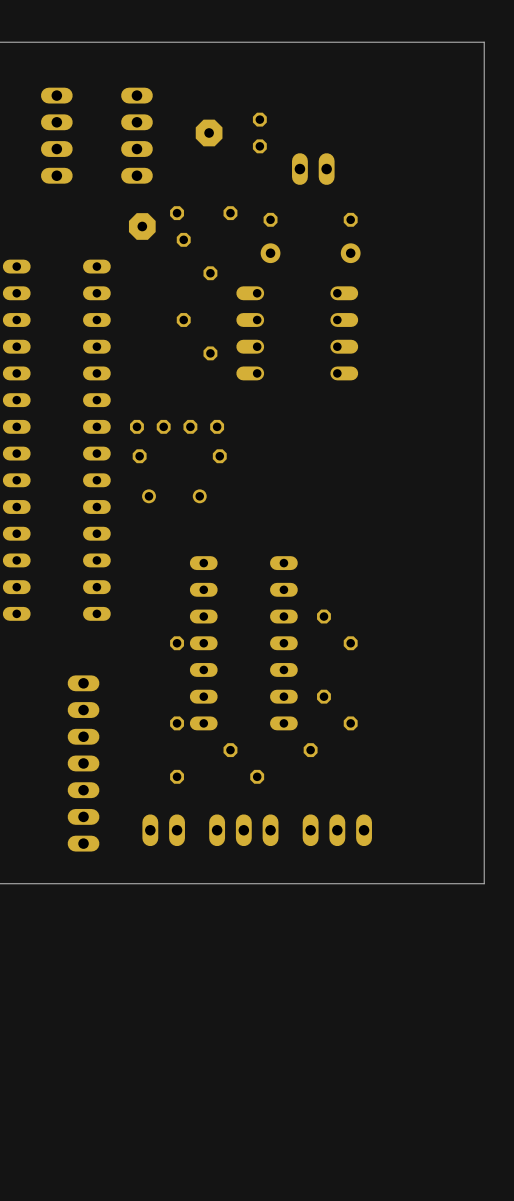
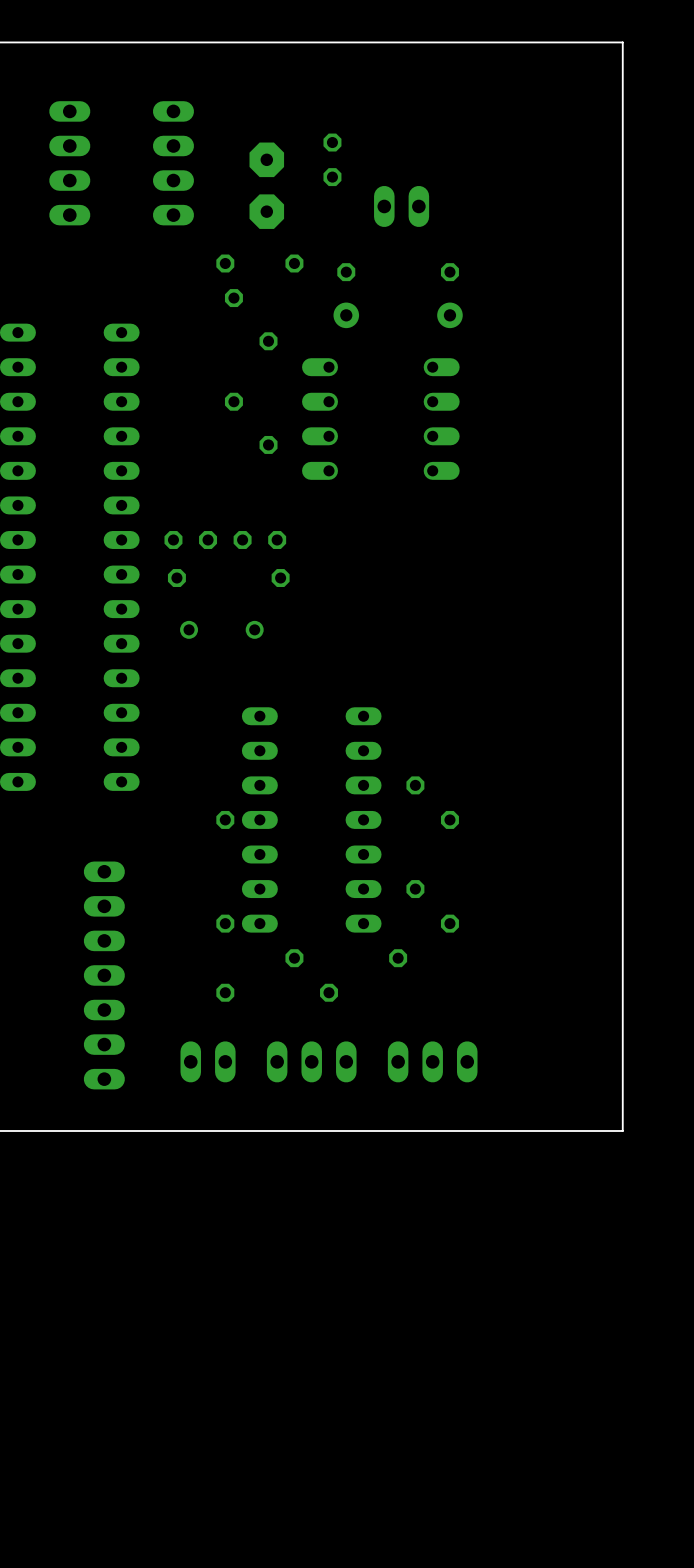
part position: (142, 226) -> (266, 211)

